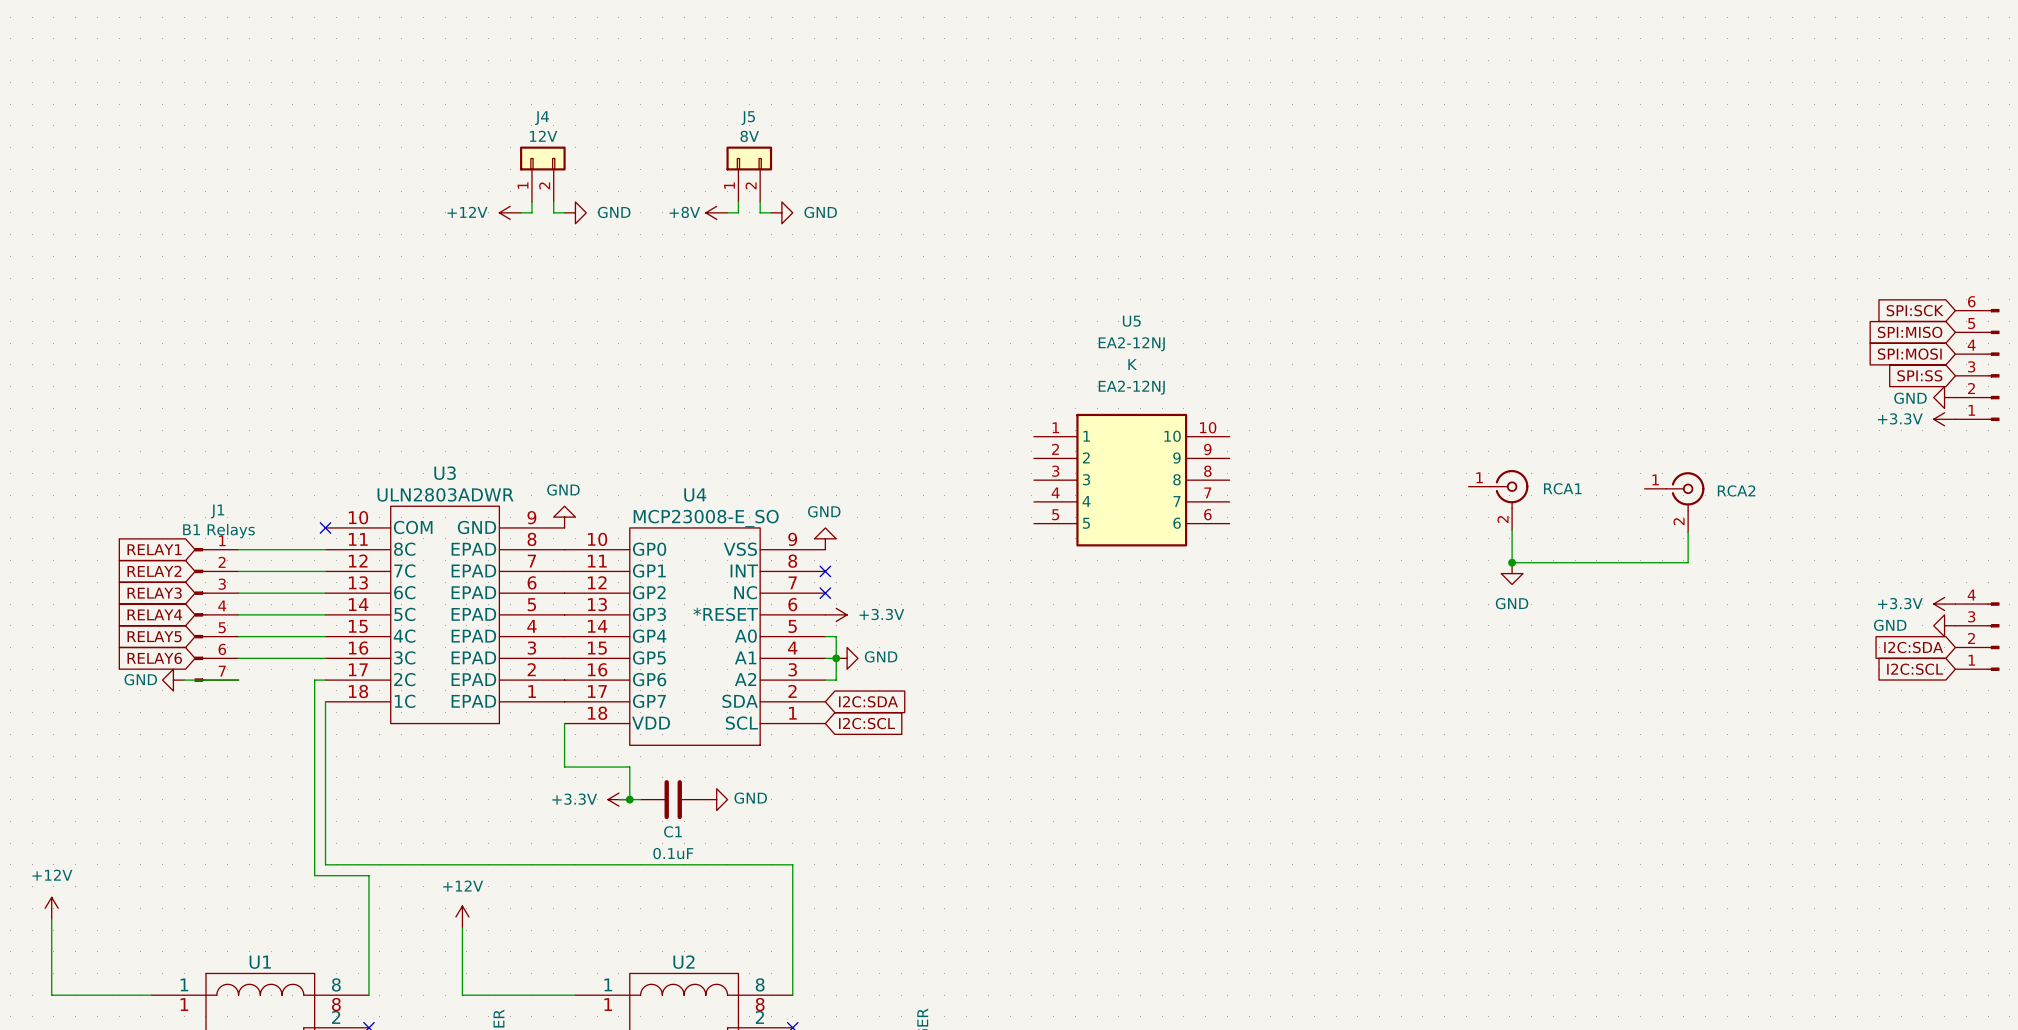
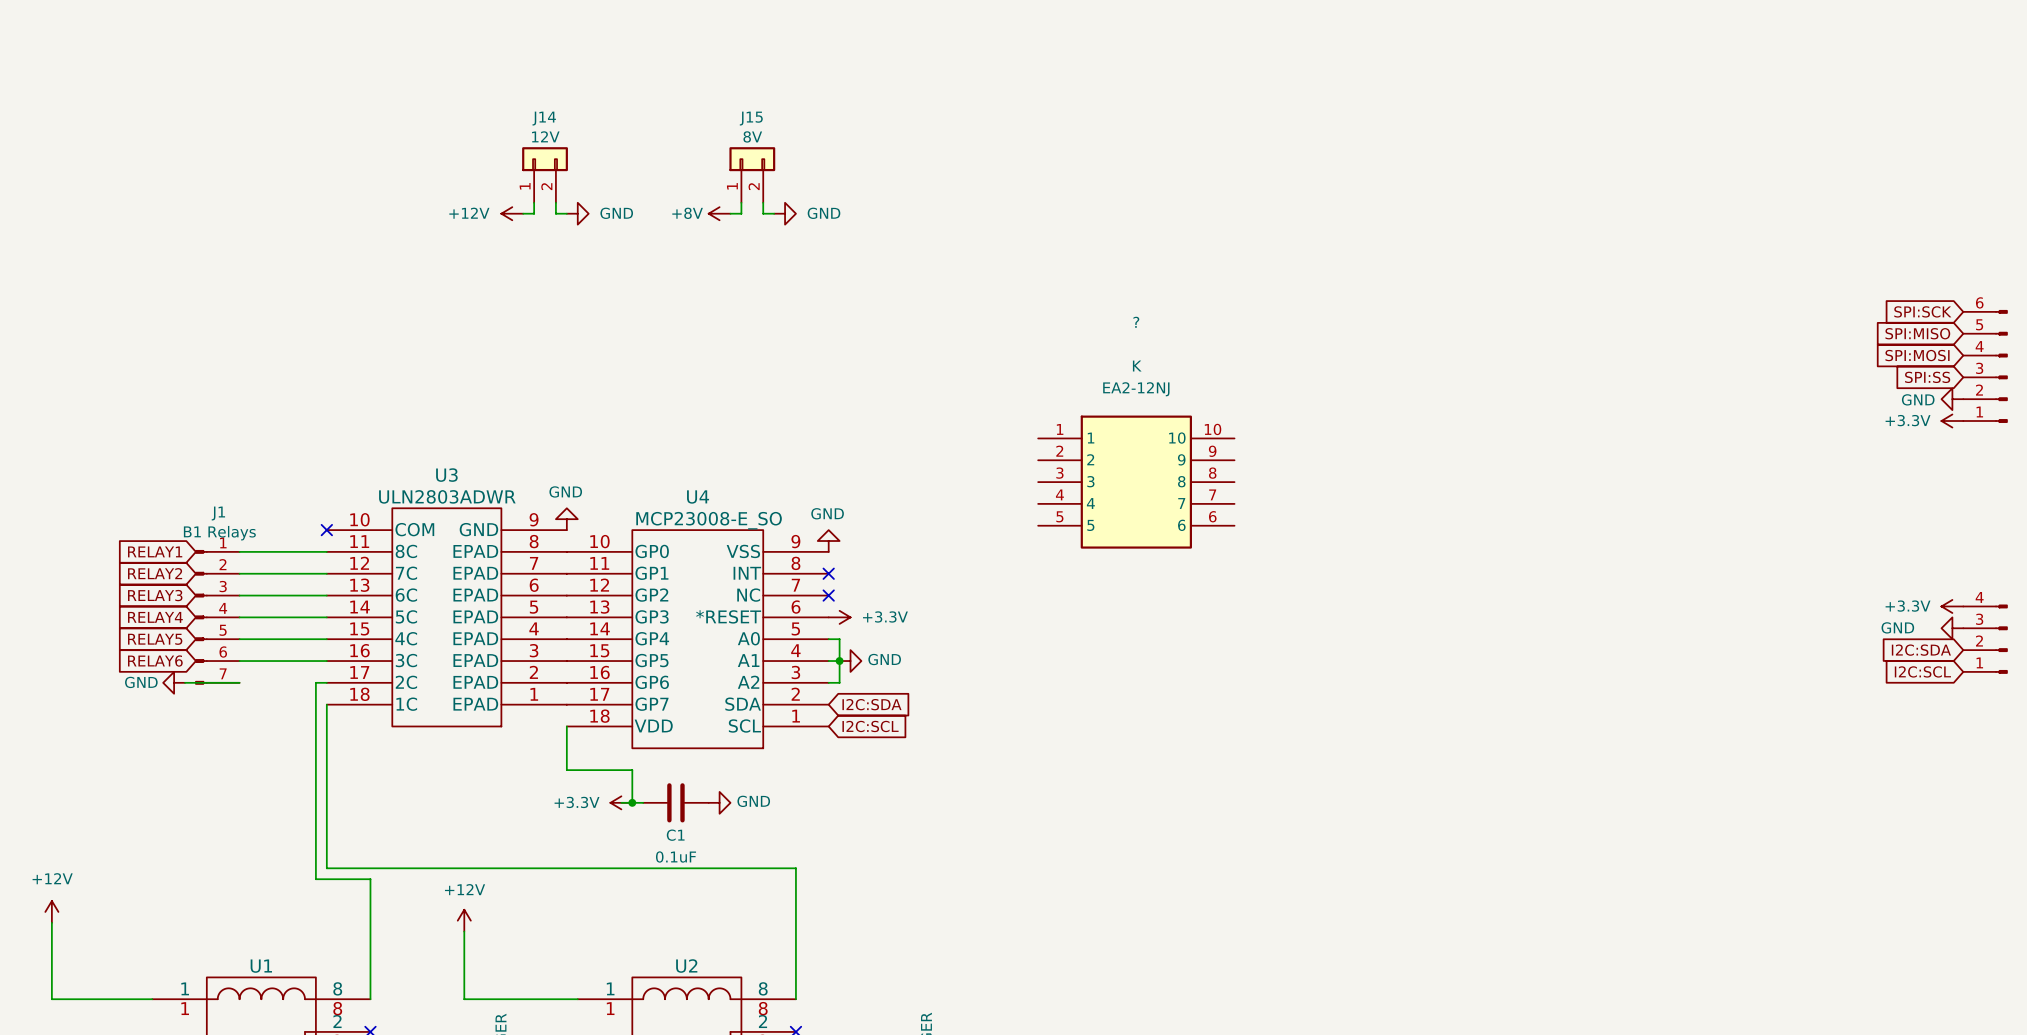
J4 name: J4 (542, 118) -> J14 (544, 118)
J5 name: J5 (748, 118) -> J15 (751, 118)
U5 name: U5 (1131, 321) -> ? (1136, 322)
U5 value: EA2-12NJ (1131, 344) -> none
RCA1: (1498, 500) -> none
RCA2: (1674, 502) -> none
wire: (1512, 530) (1512, 562) (1688, 562) (1688, 532) -> none
junction: (1512, 562) -> none
power symbol: GND (1512, 573) -> none

